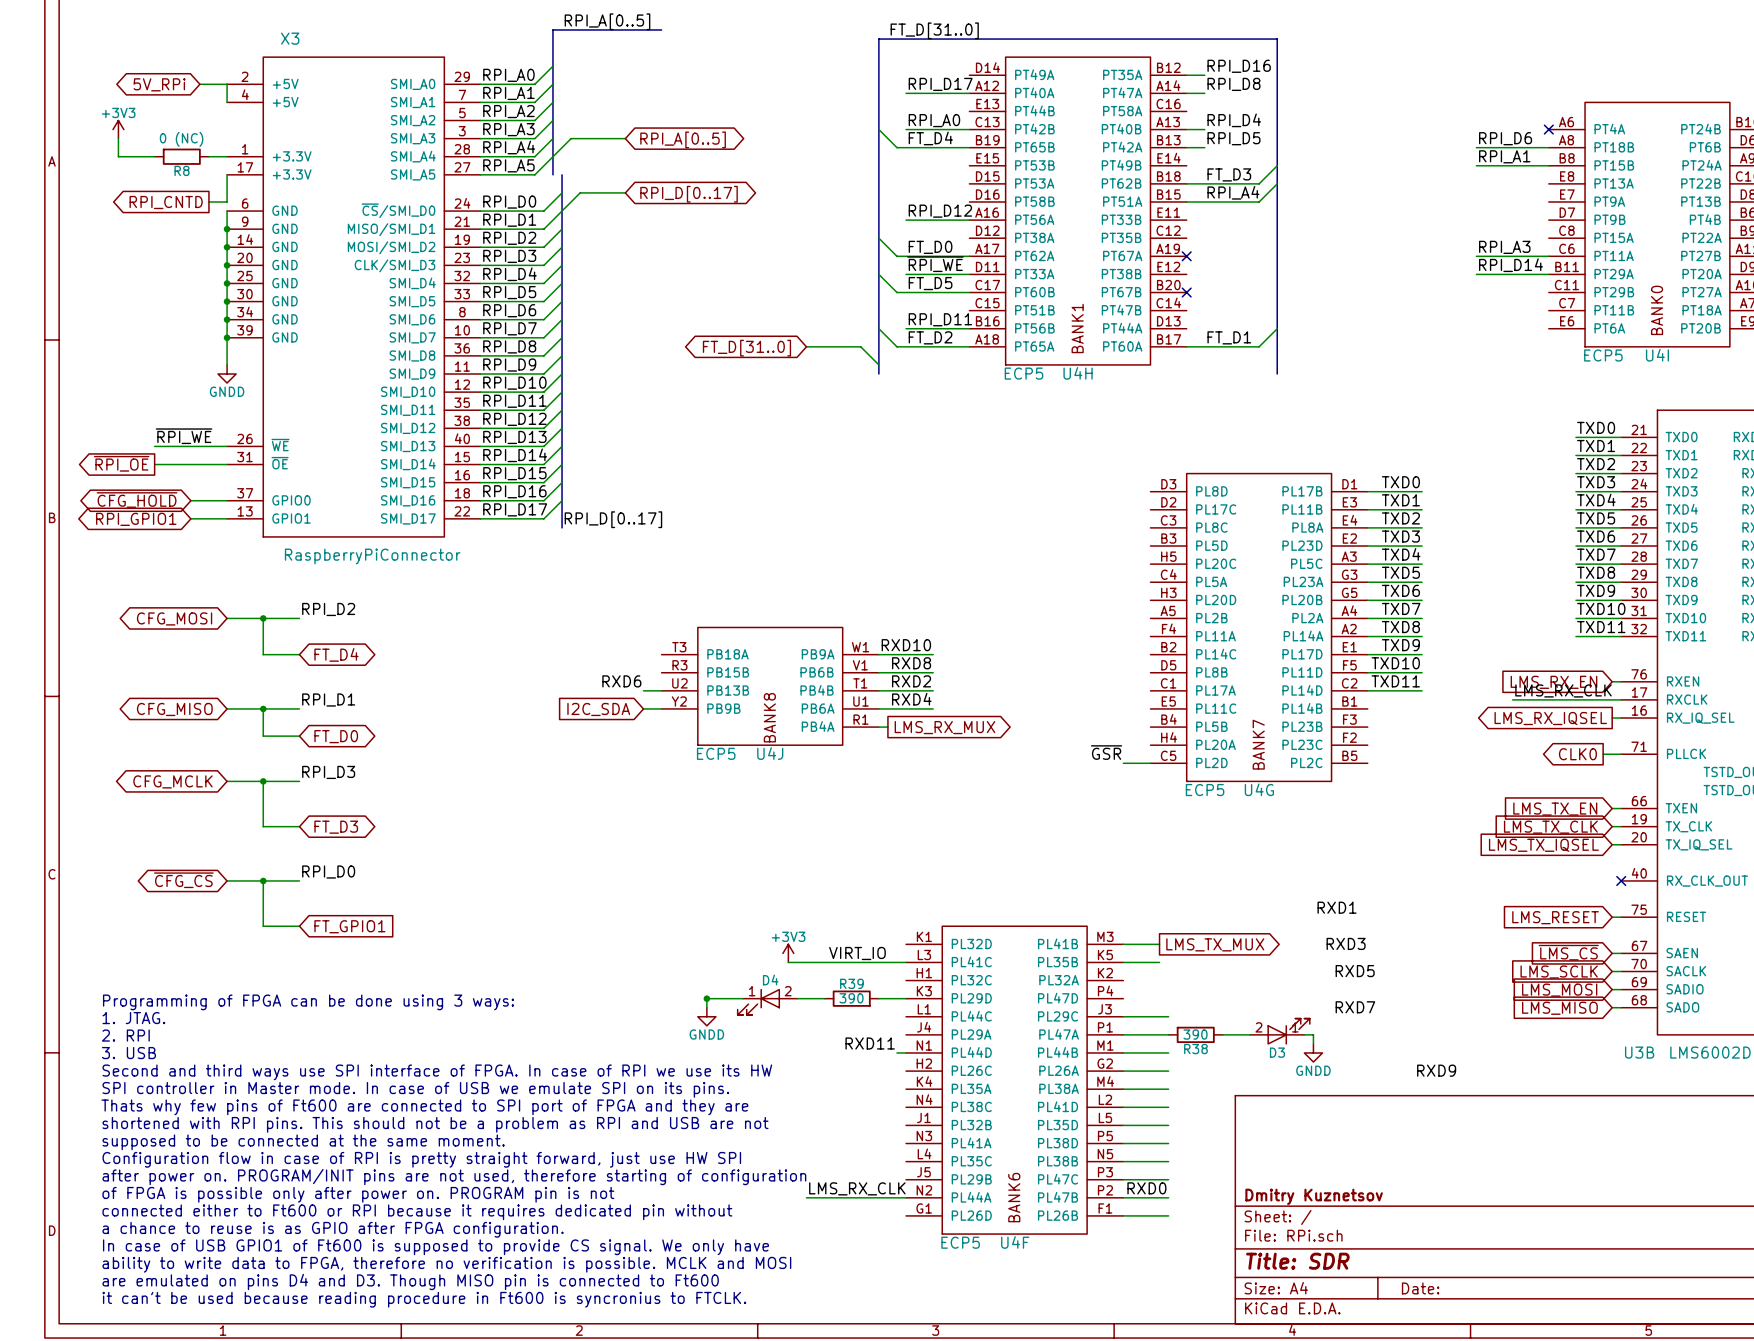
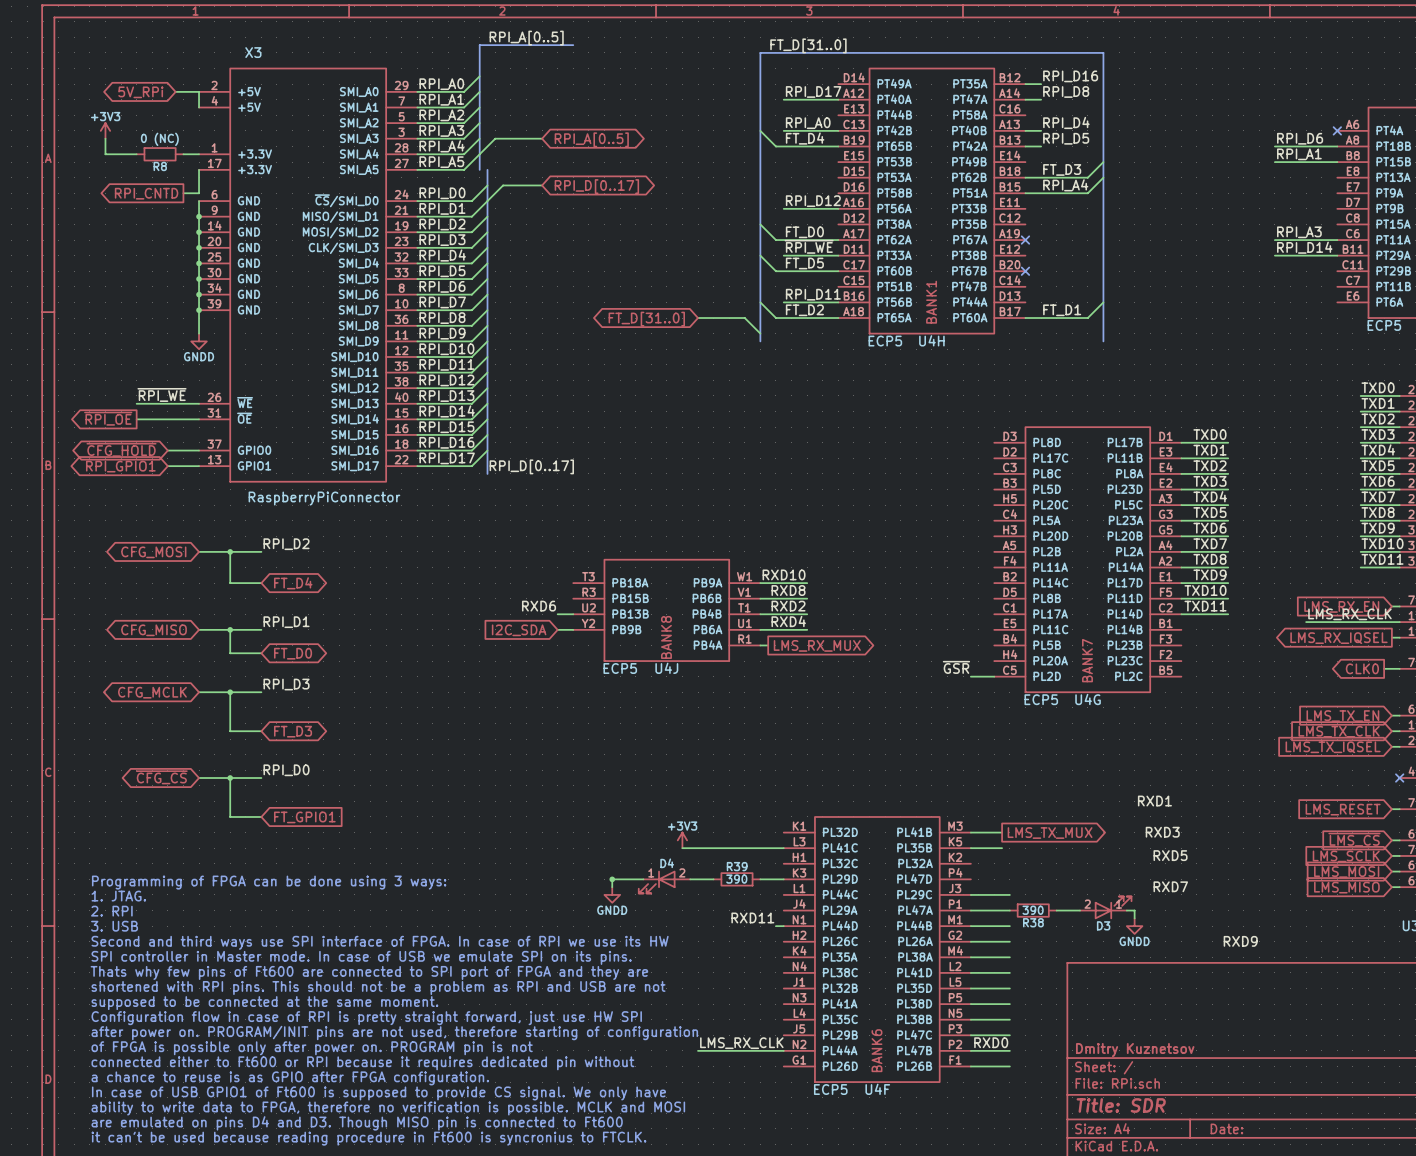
label: VIRT_IO (857, 953) -> none

